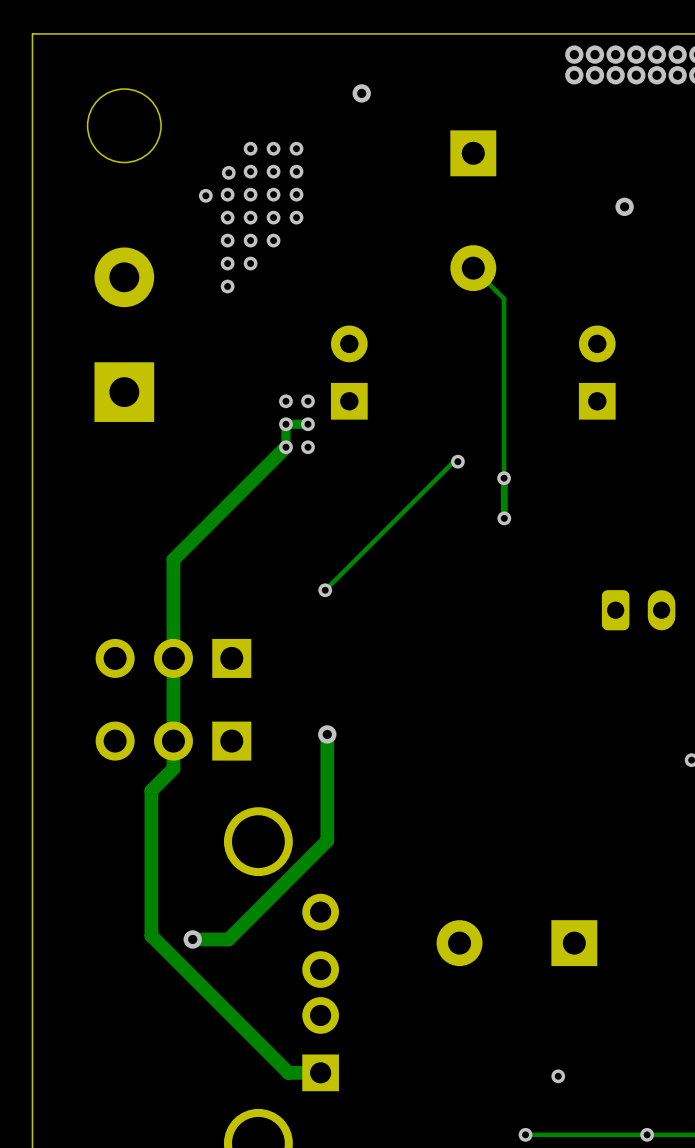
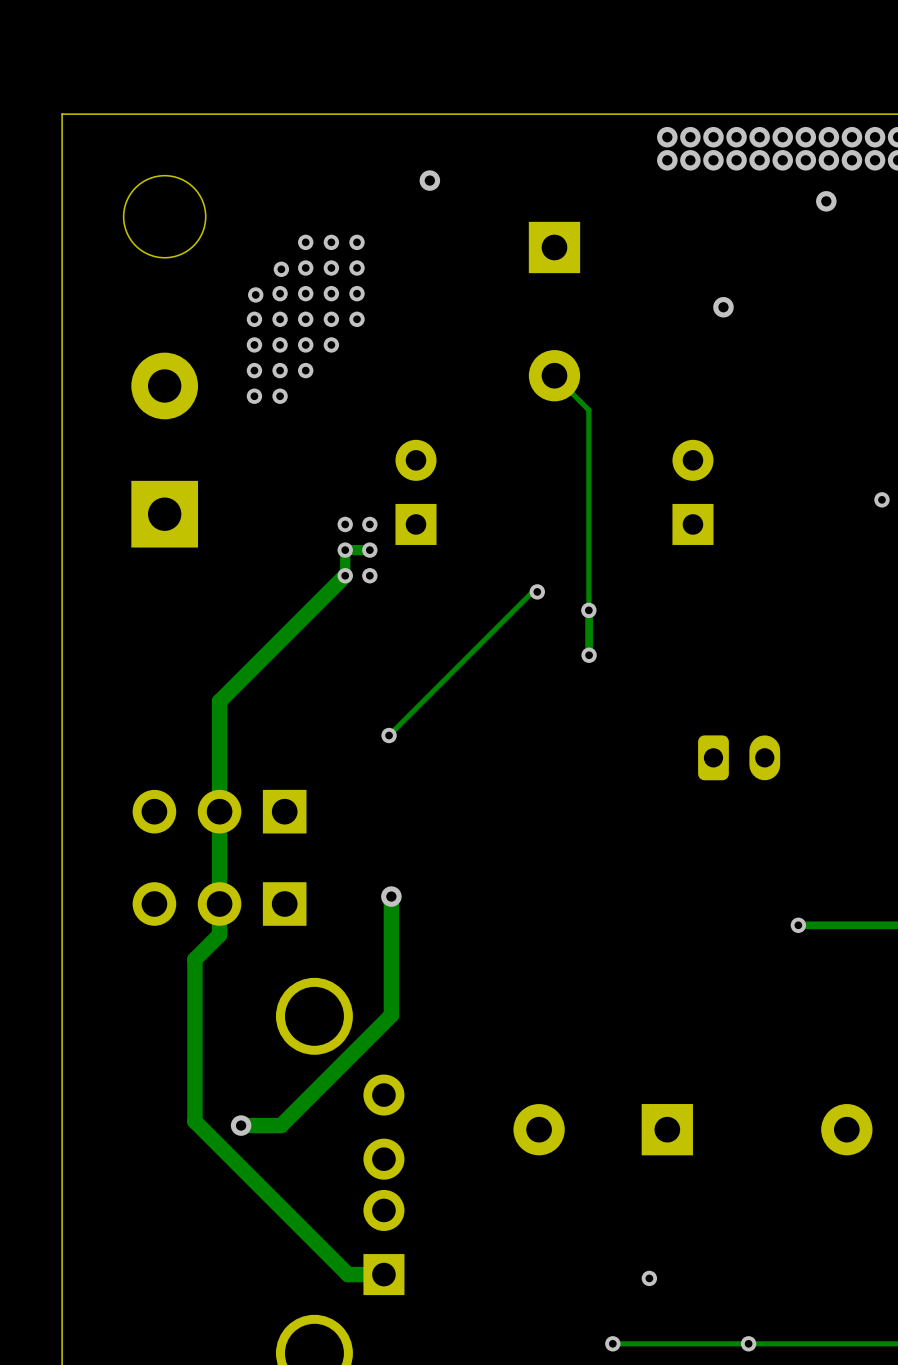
via: none -> (254, 319)
via: none -> (254, 344)
via: none -> (254, 370)
via: none -> (254, 396)

